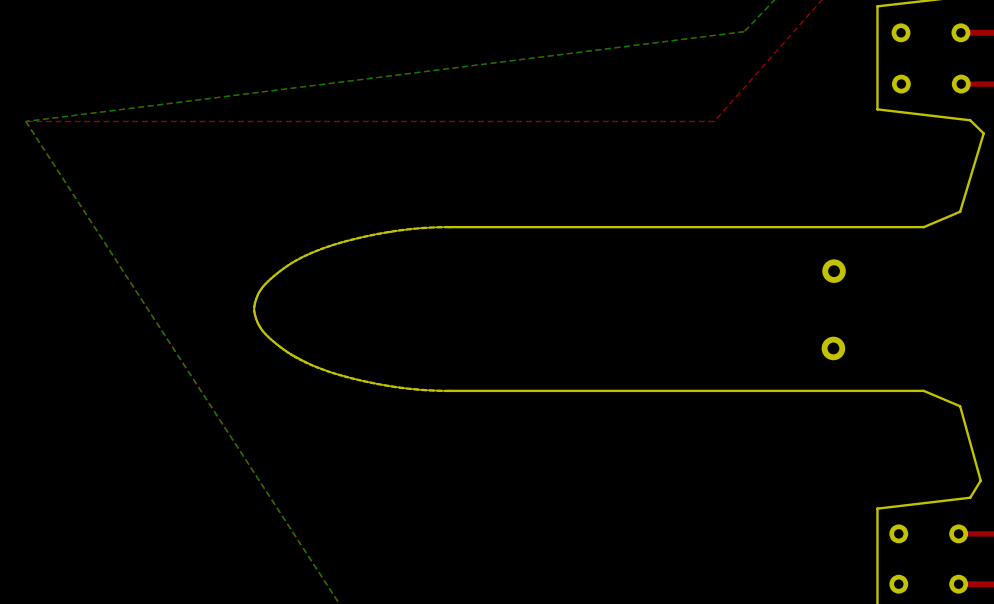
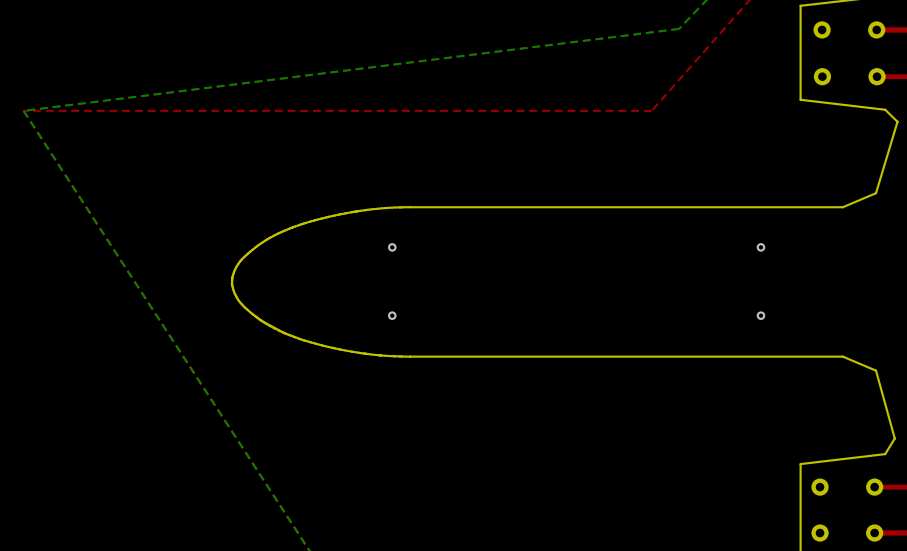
via: none -> (392, 247)
part: (834, 271) -> none
via: none -> (760, 247)
via: none -> (392, 315)
via: none -> (760, 315)
part: (833, 348) -> none

